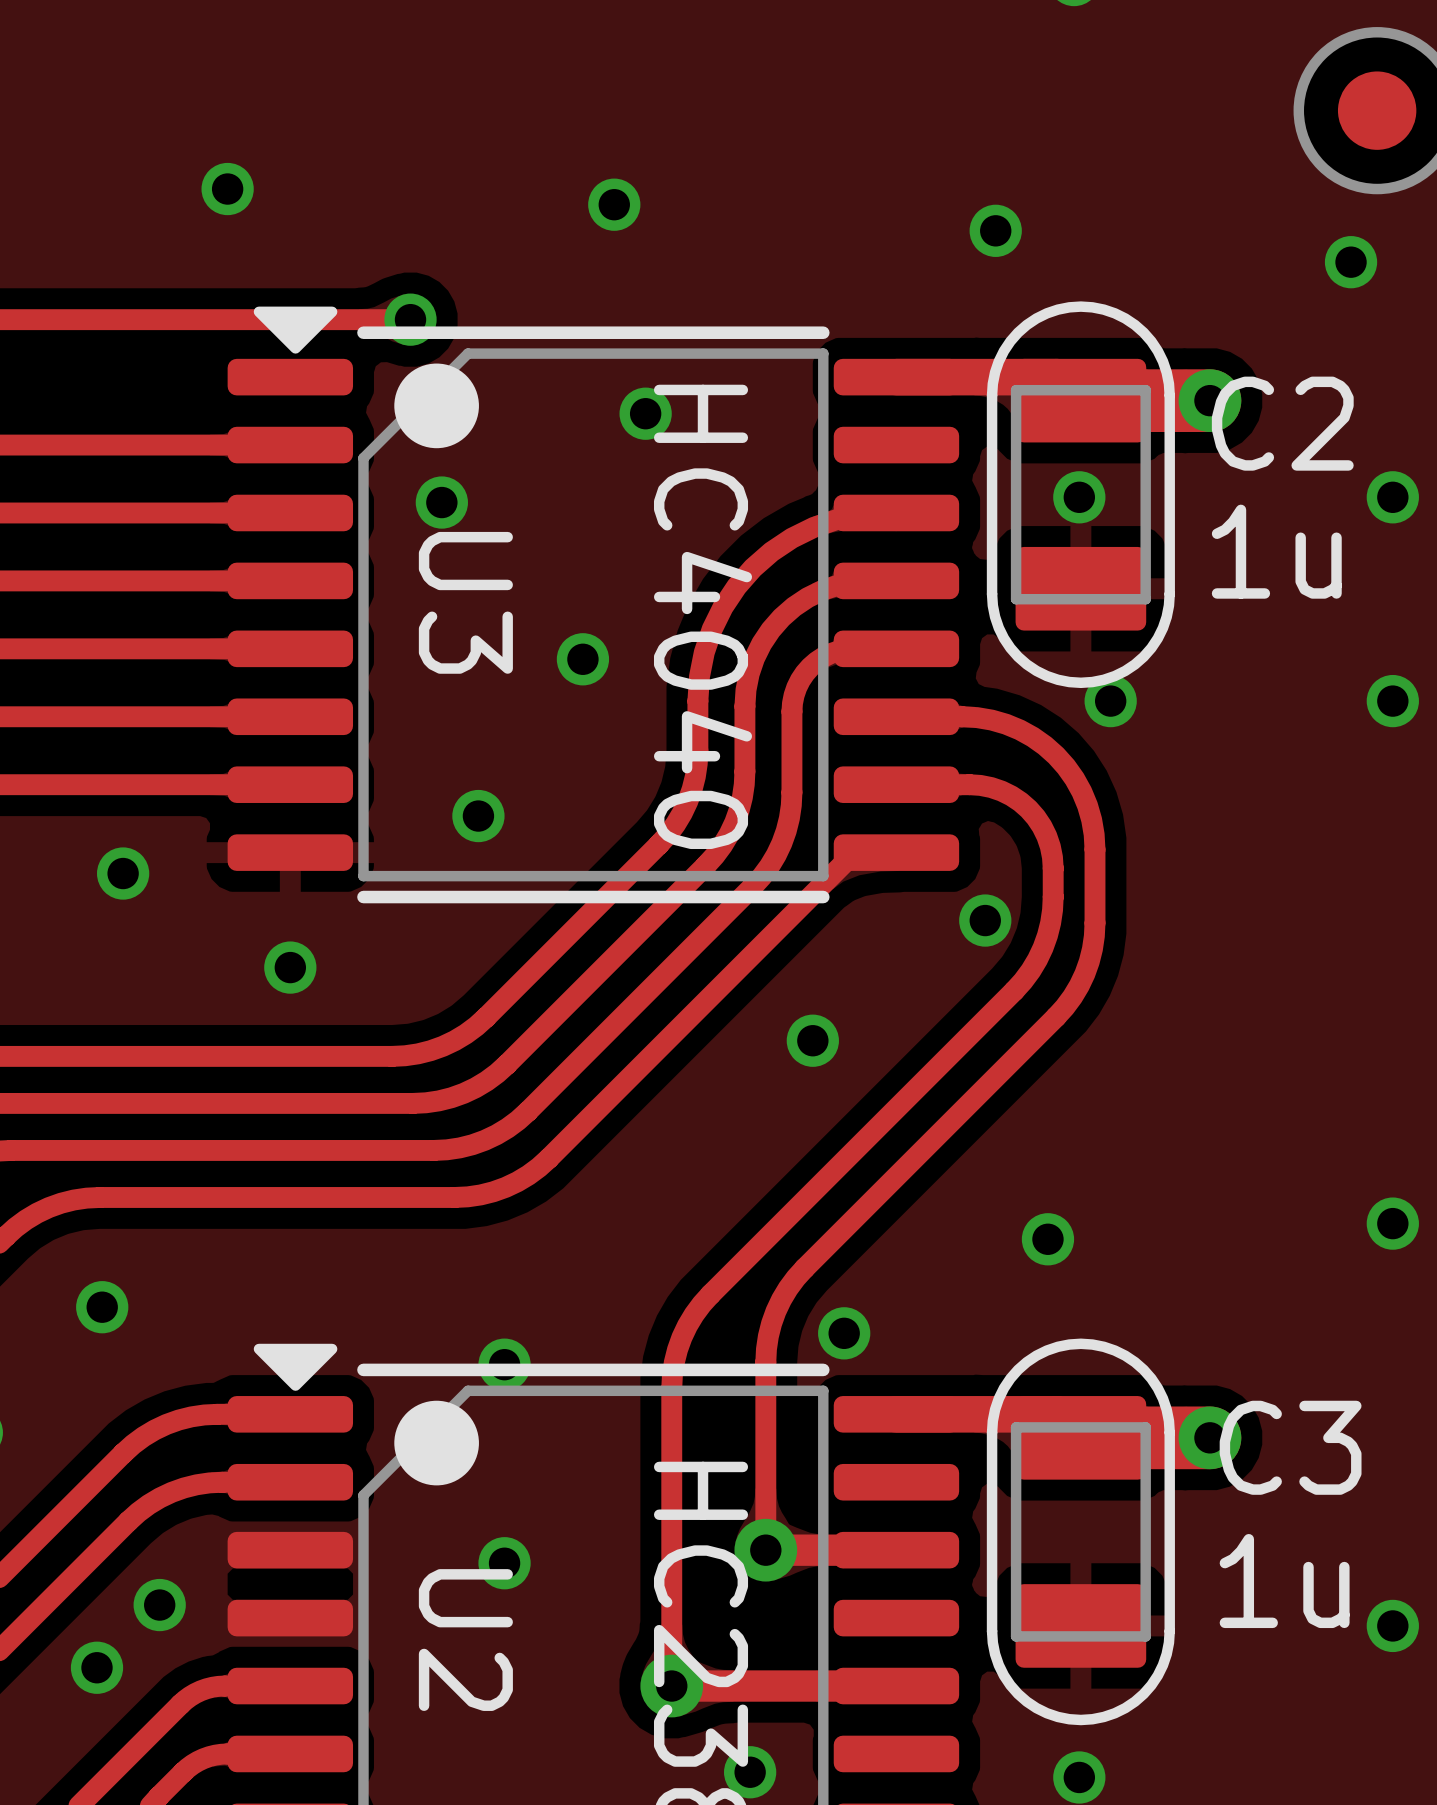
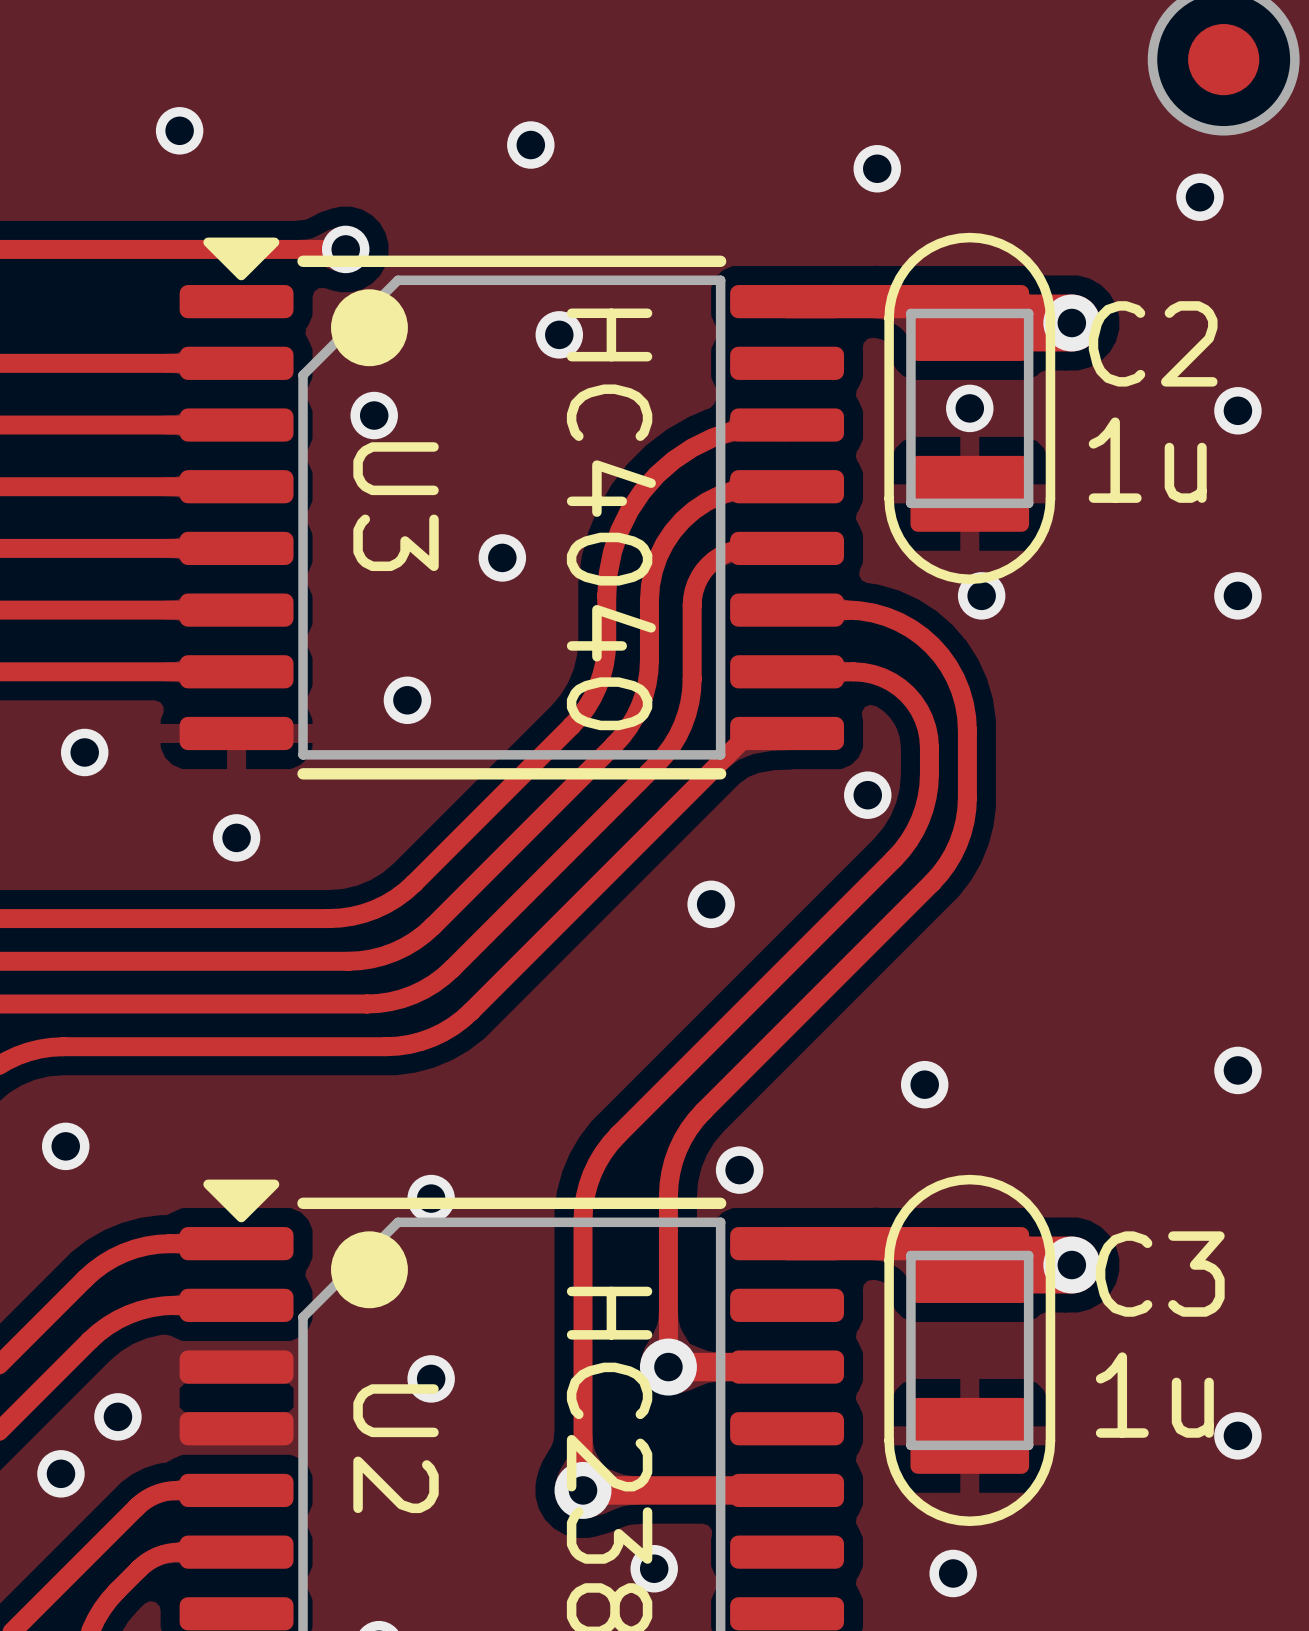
C2 position: (1080, 494) -> (969, 408)
via position: (1079, 497) -> (969, 408)
C3 position: (1080, 1531) -> (969, 1350)

